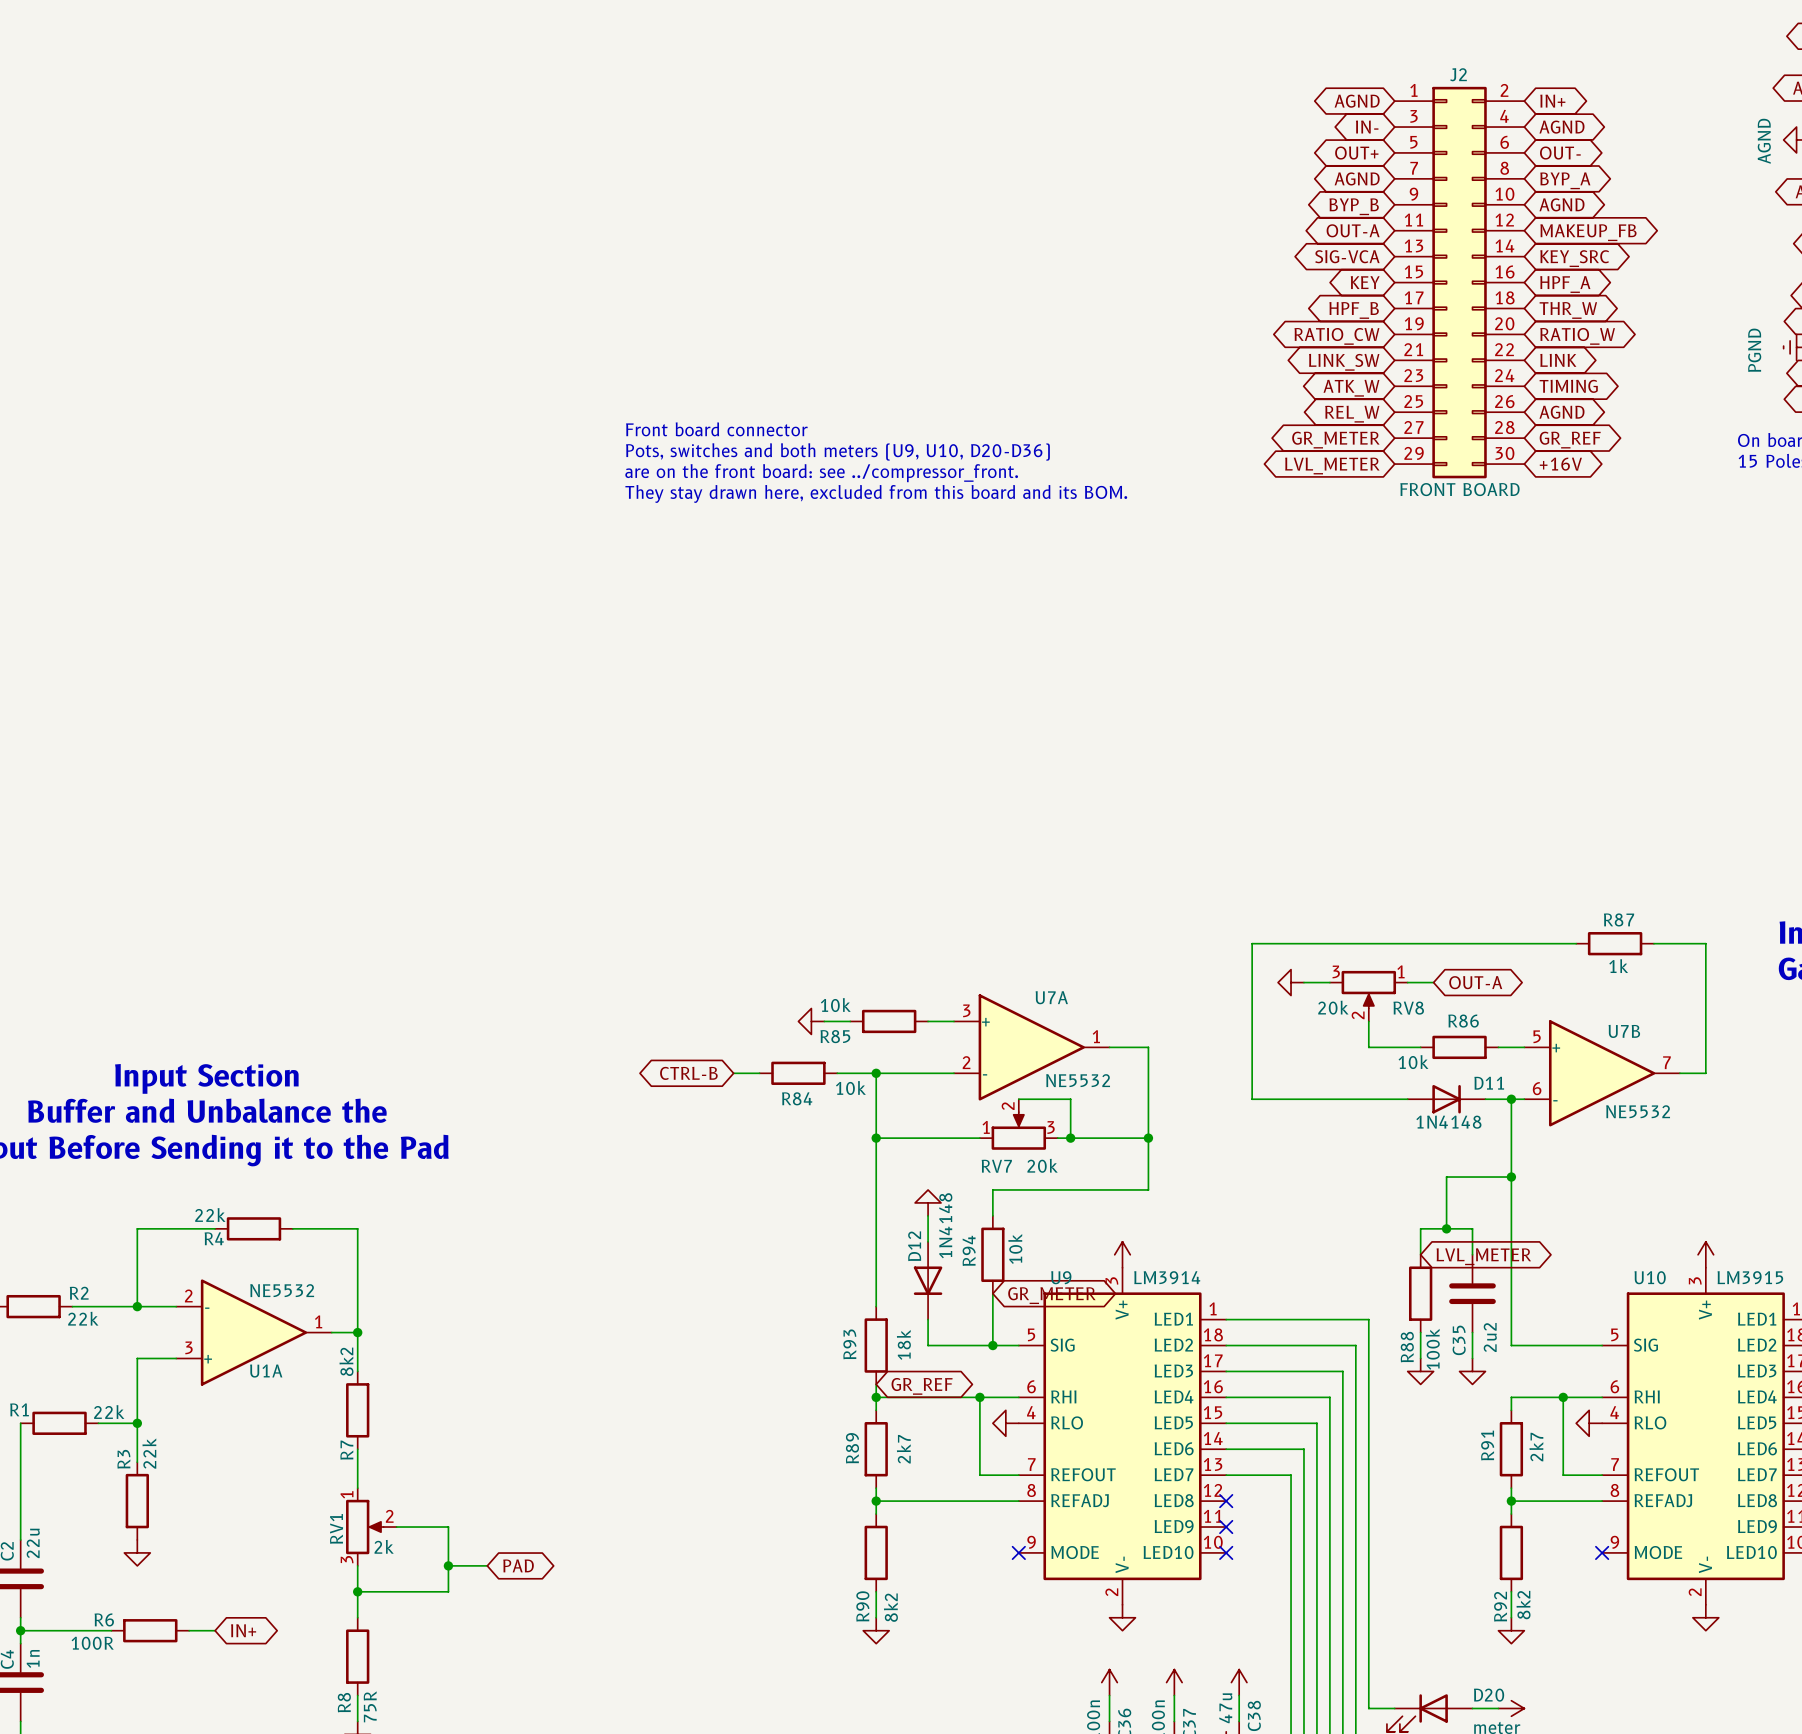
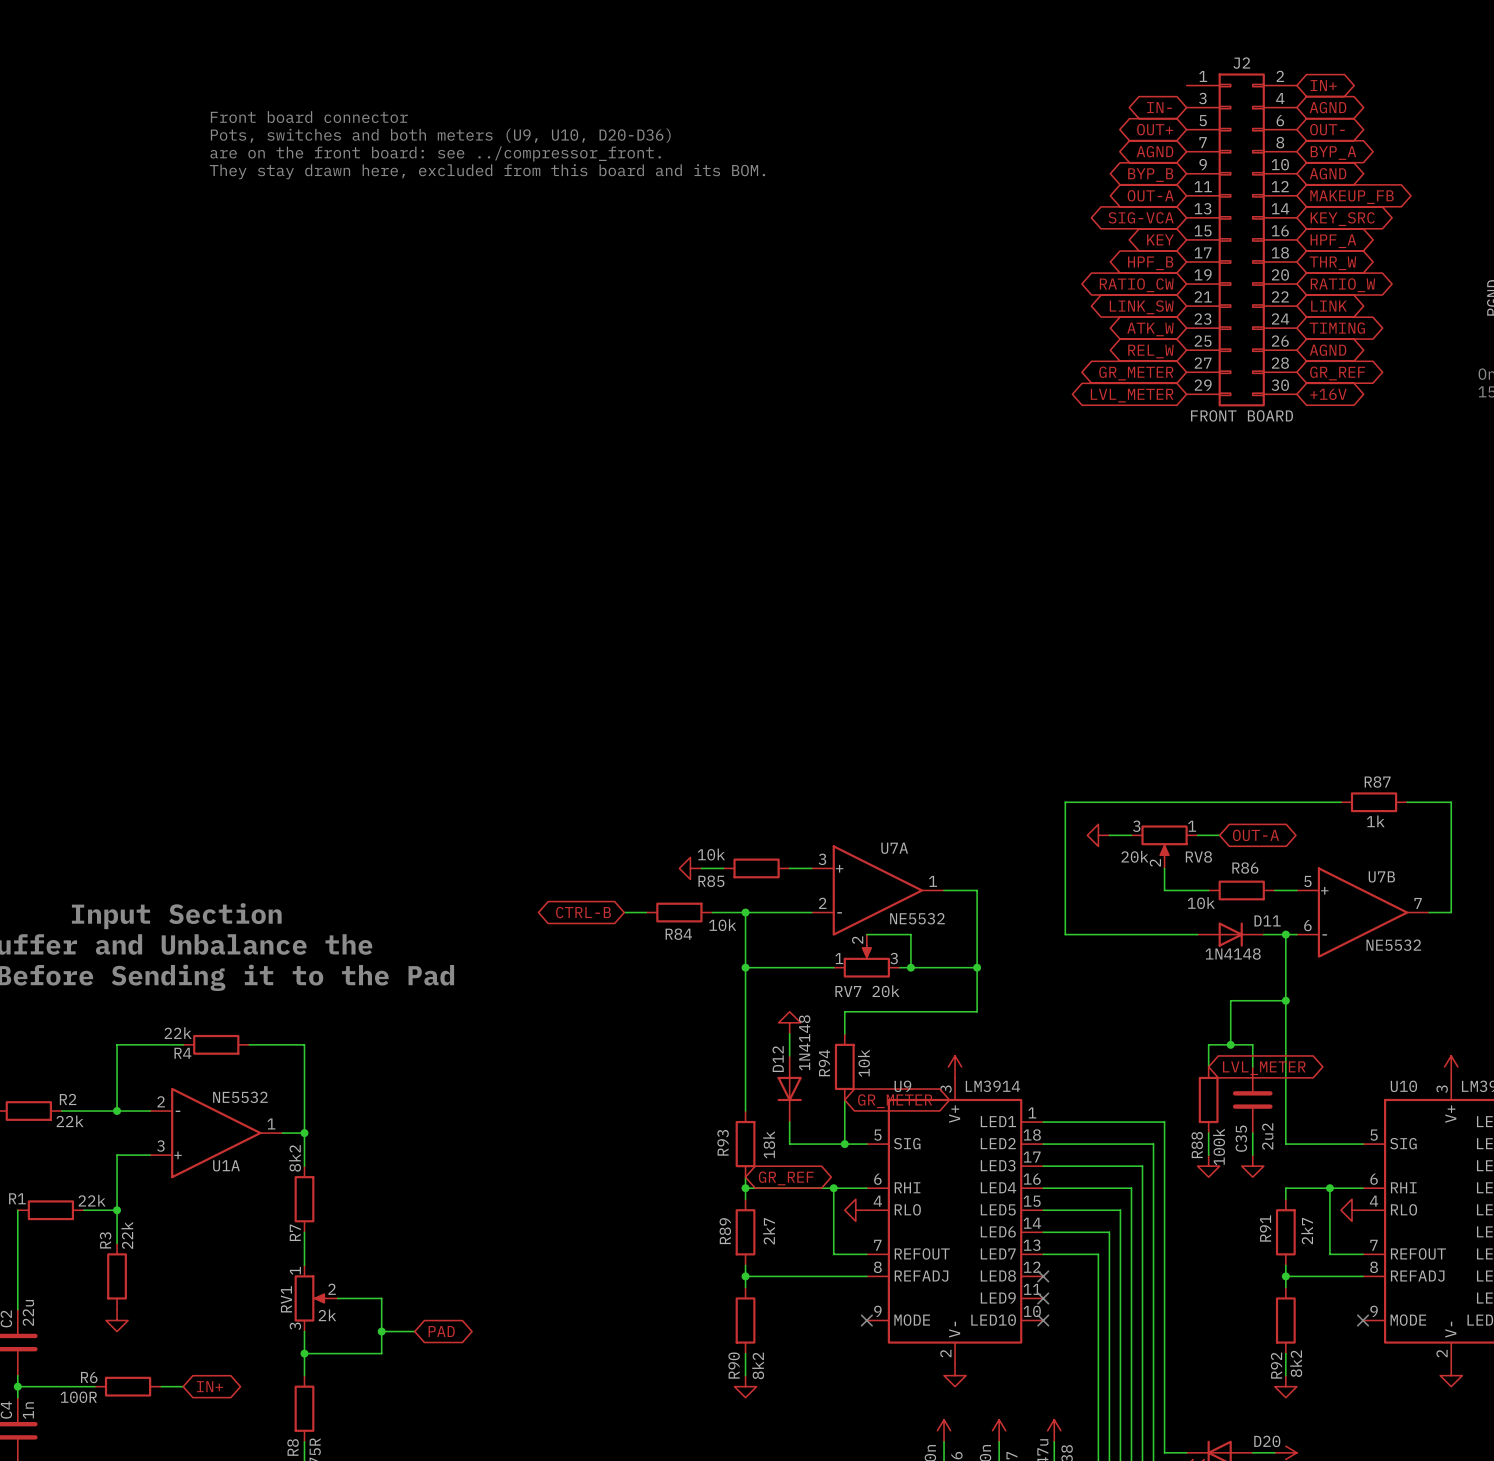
global label: AGND (1357, 101) -> none
text: none -> Front board connector (309, 117)
text: none -> Pots, switches and both meters (U9, U10, D20-D36) (440, 135)
text: none -> are on the front board: see ../compressor_front. (435, 153)
text: none -> They stay drawn here, excluded from this board and its BOM. (487, 171)
text: Front board connector (716, 429) -> none
text: Pots, switches and both meters (U9, U10, D20-D36) (837, 451) -> none
text: are on the front board: see ../compressor_front. (821, 473) -> none
text: They stay drawn here, excluded from this board and its BOM. (876, 493) -> none

